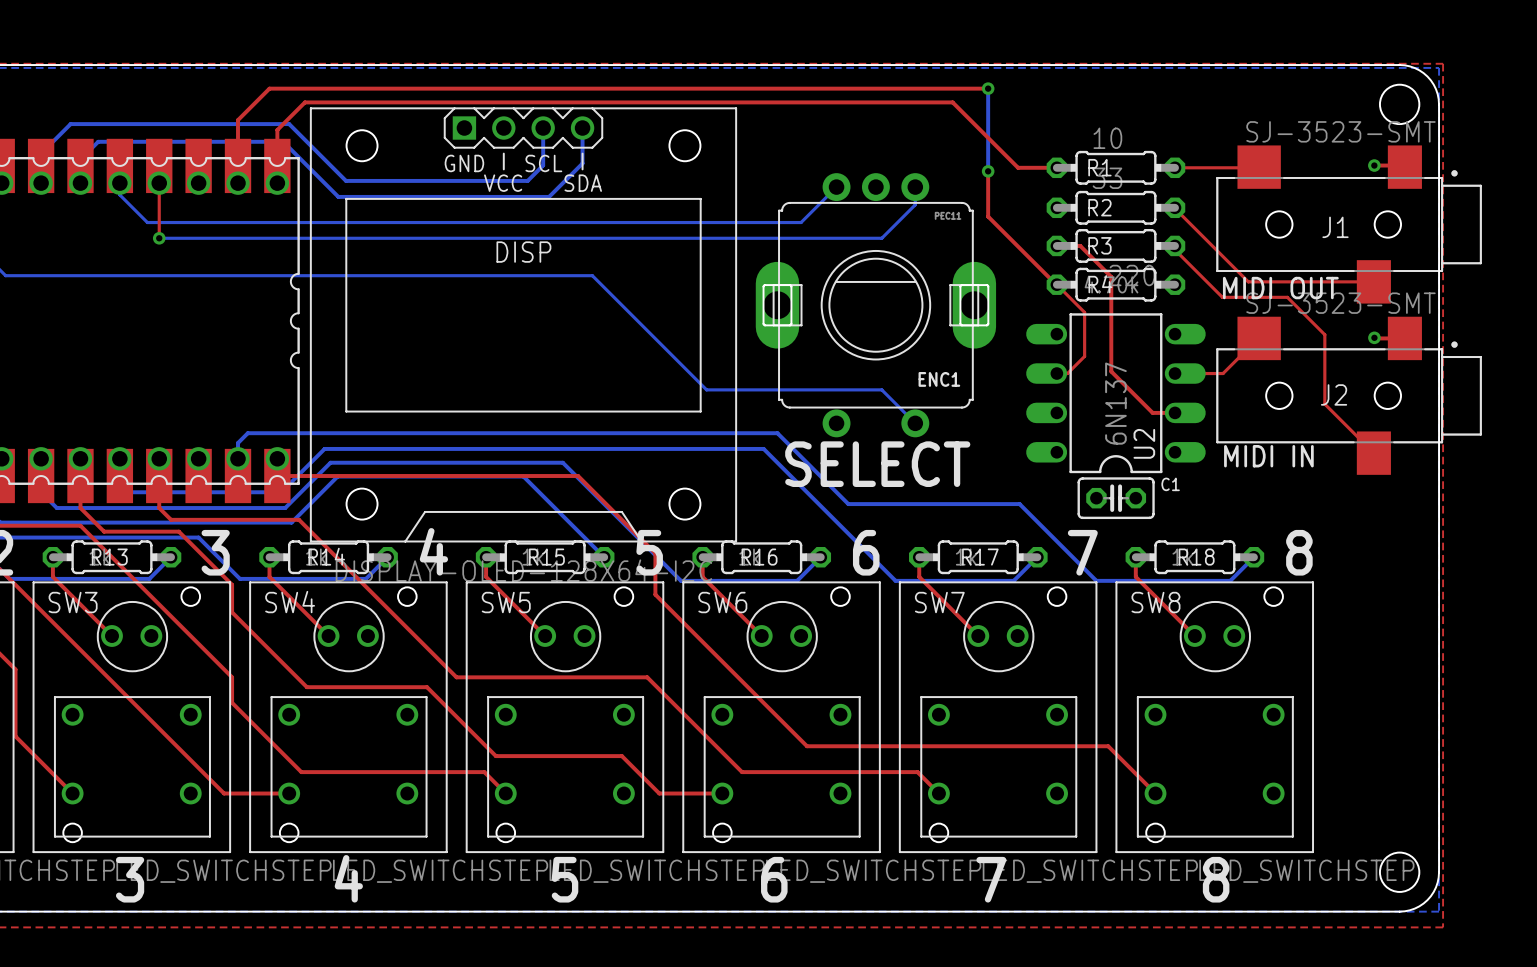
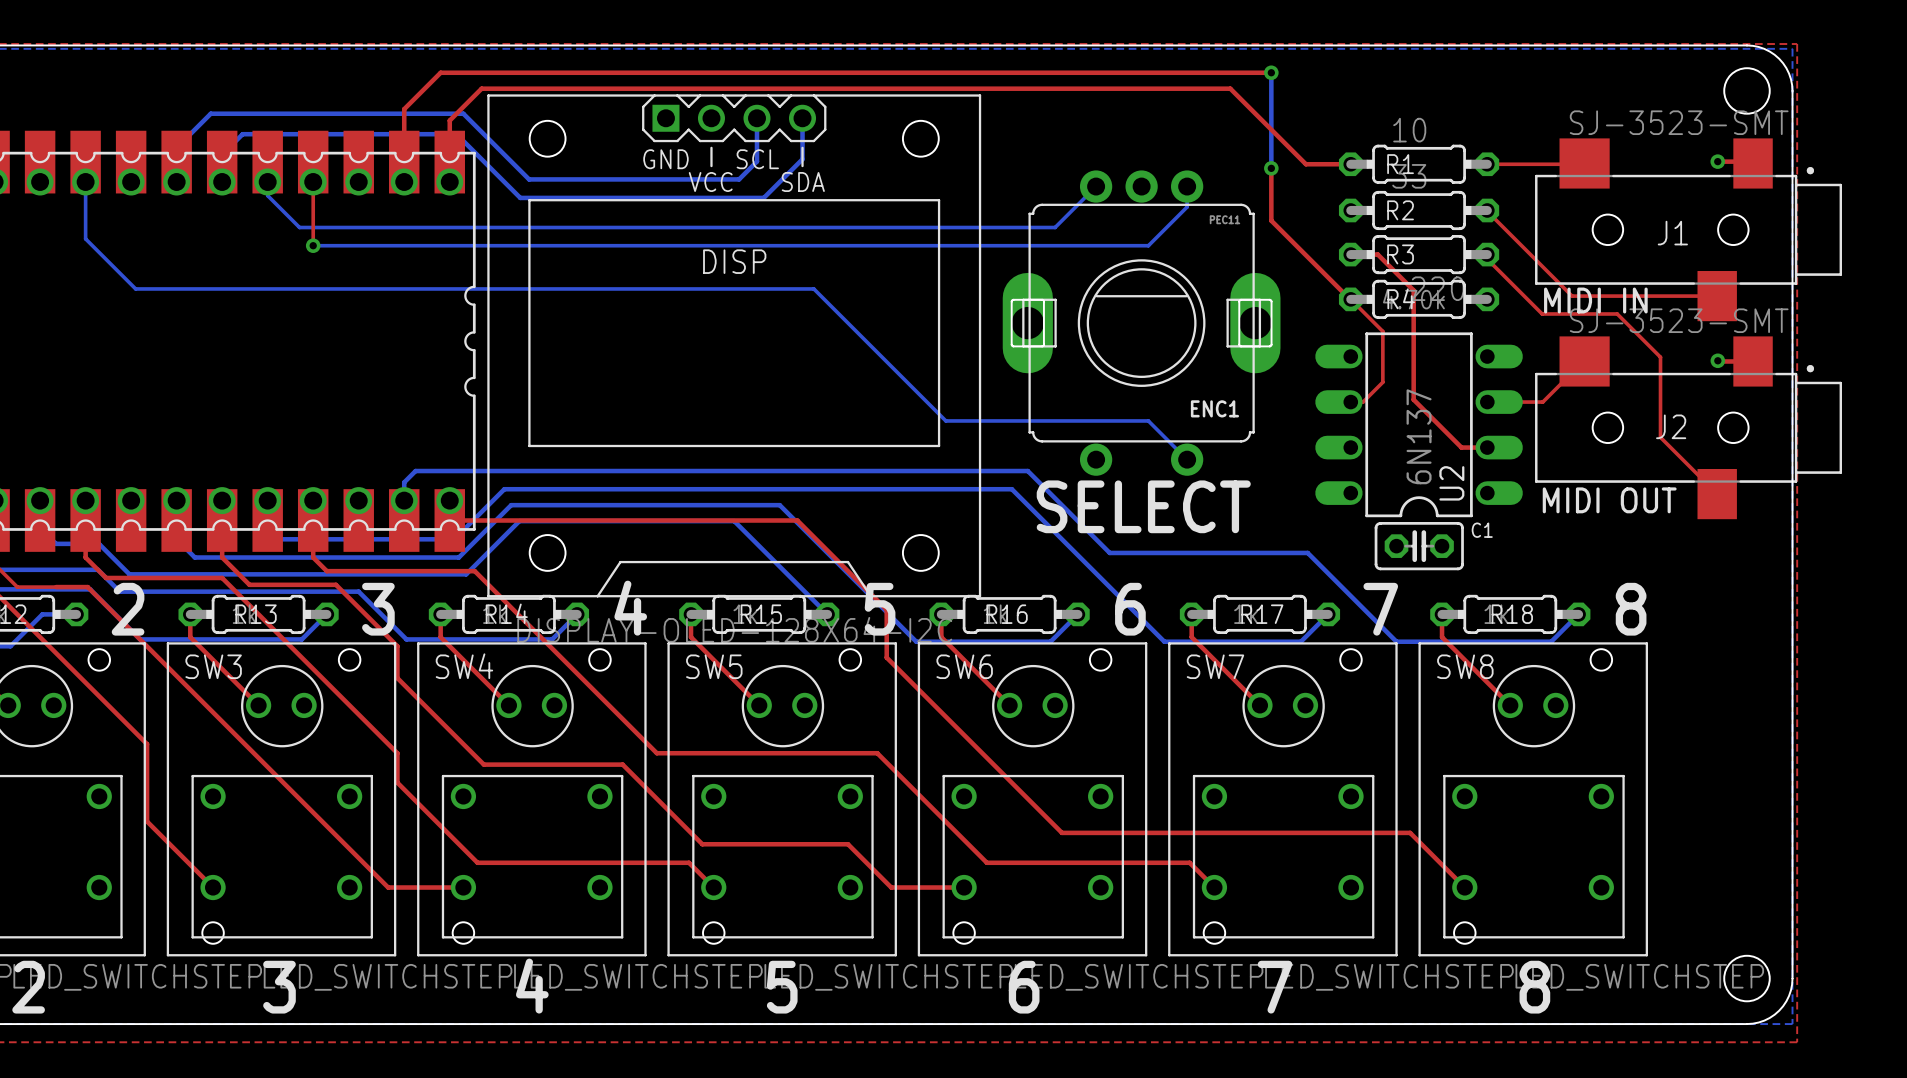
text: MIDI OUT (1280, 288) -> MIDI IN (1595, 300)
text: MIDI IN (1268, 456) -> MIDI OUT (1609, 500)

